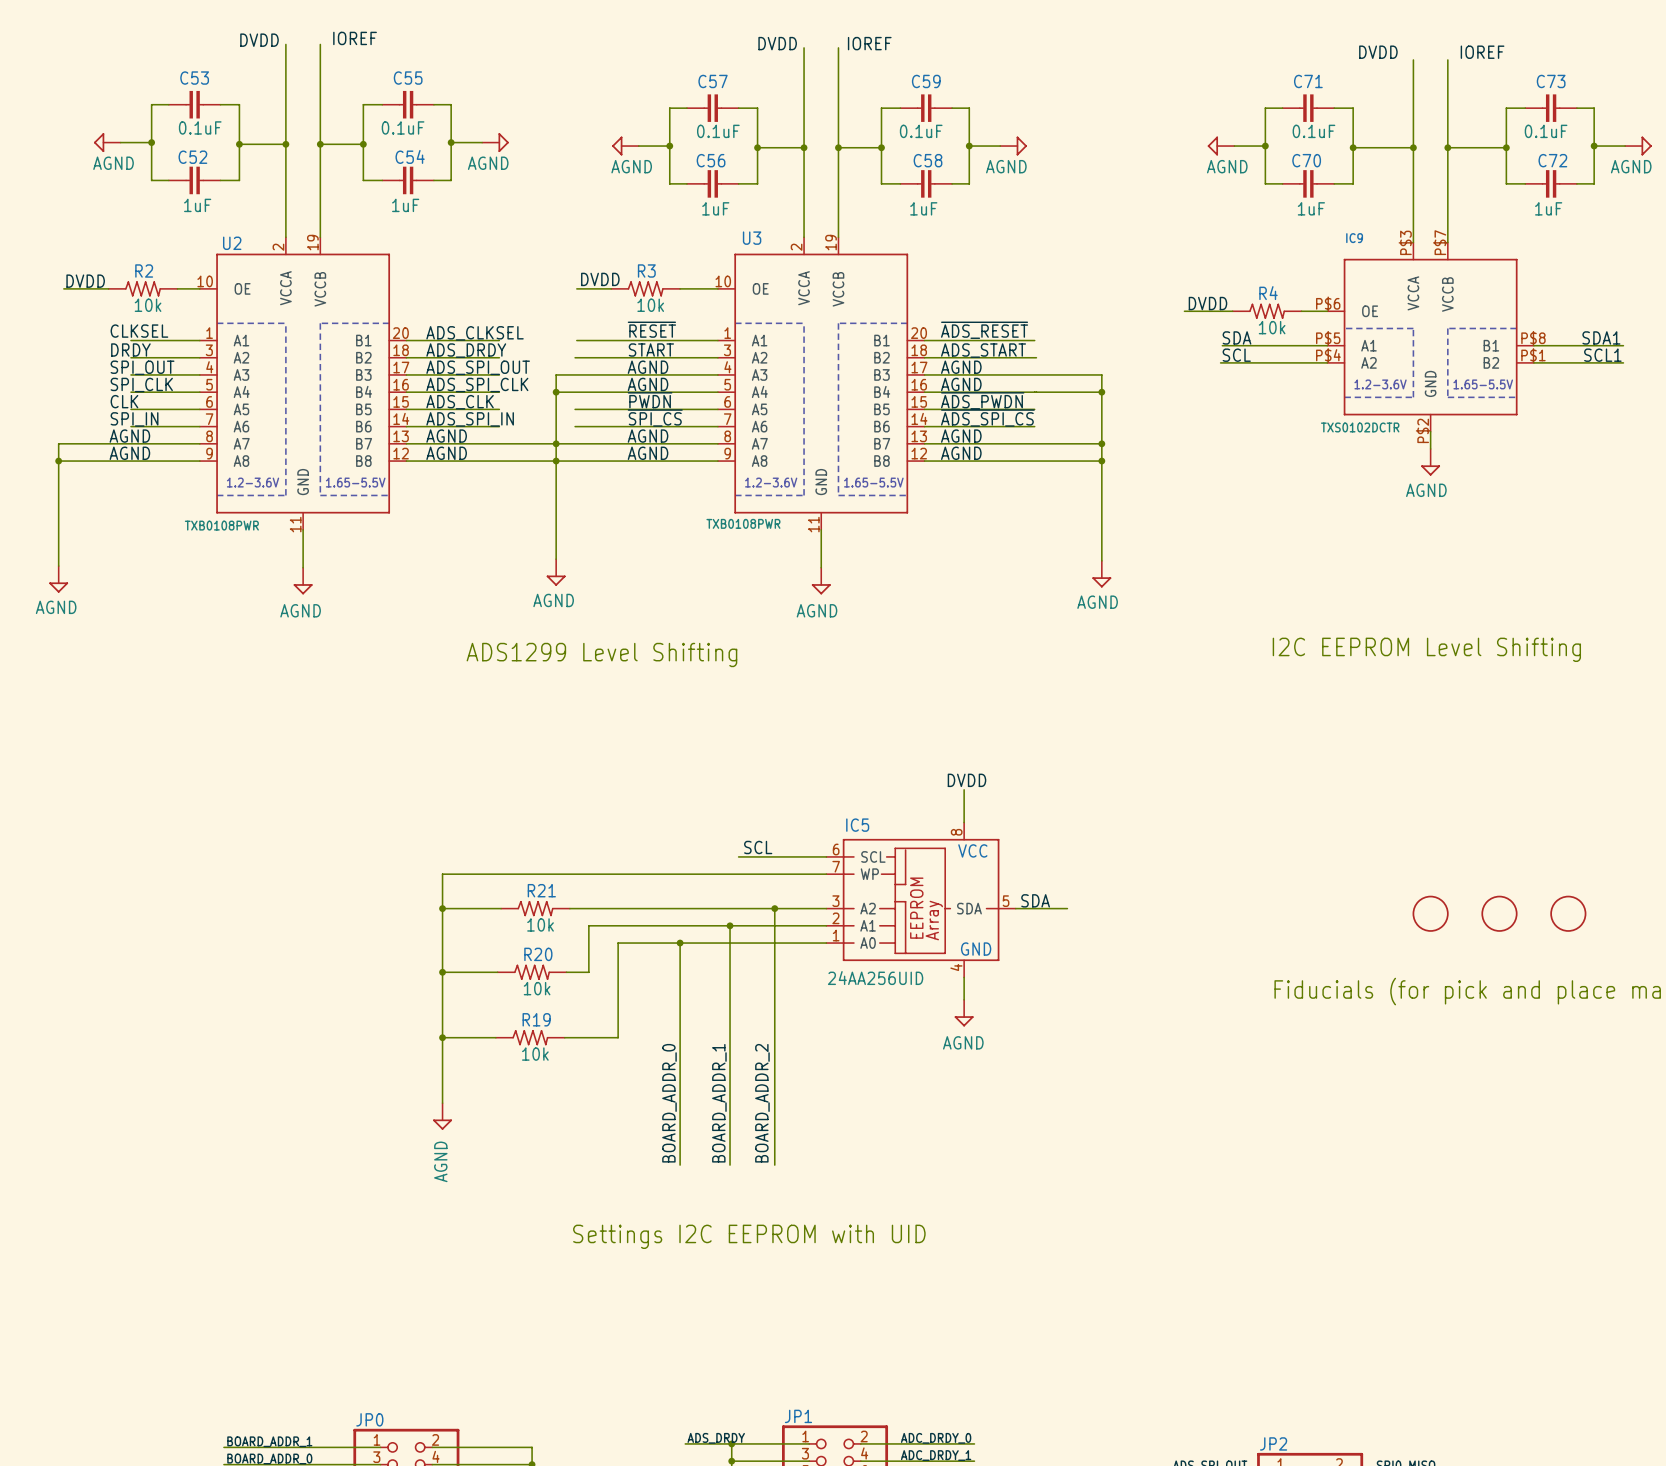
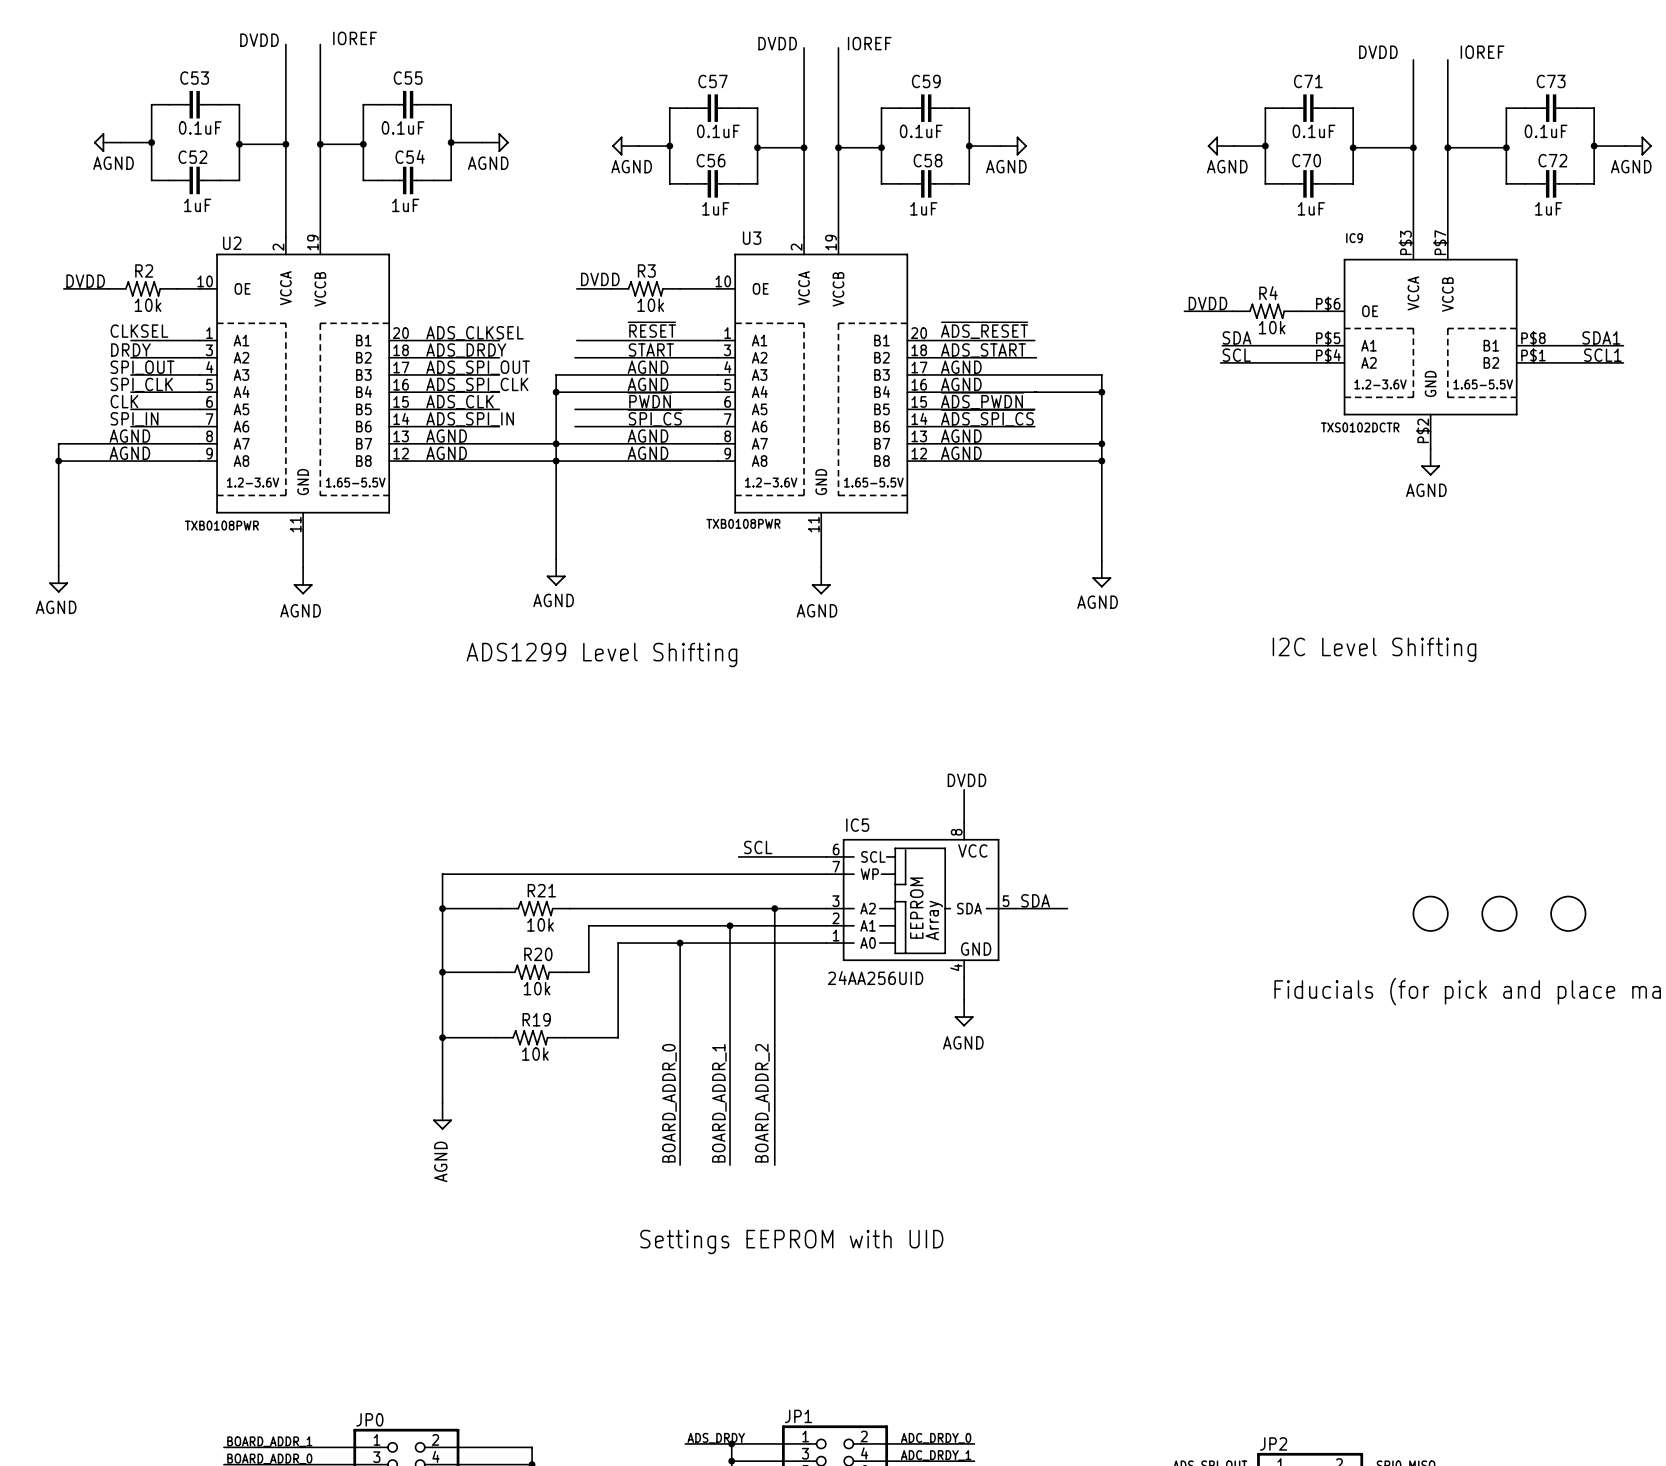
text: I2C EEPROM Level Shifting (1426, 649) -> I2C Level Shifting (1374, 649)
text: Settings I2C EEPROM with UID (749, 1236) -> Settings EEPROM with UID (791, 1241)

